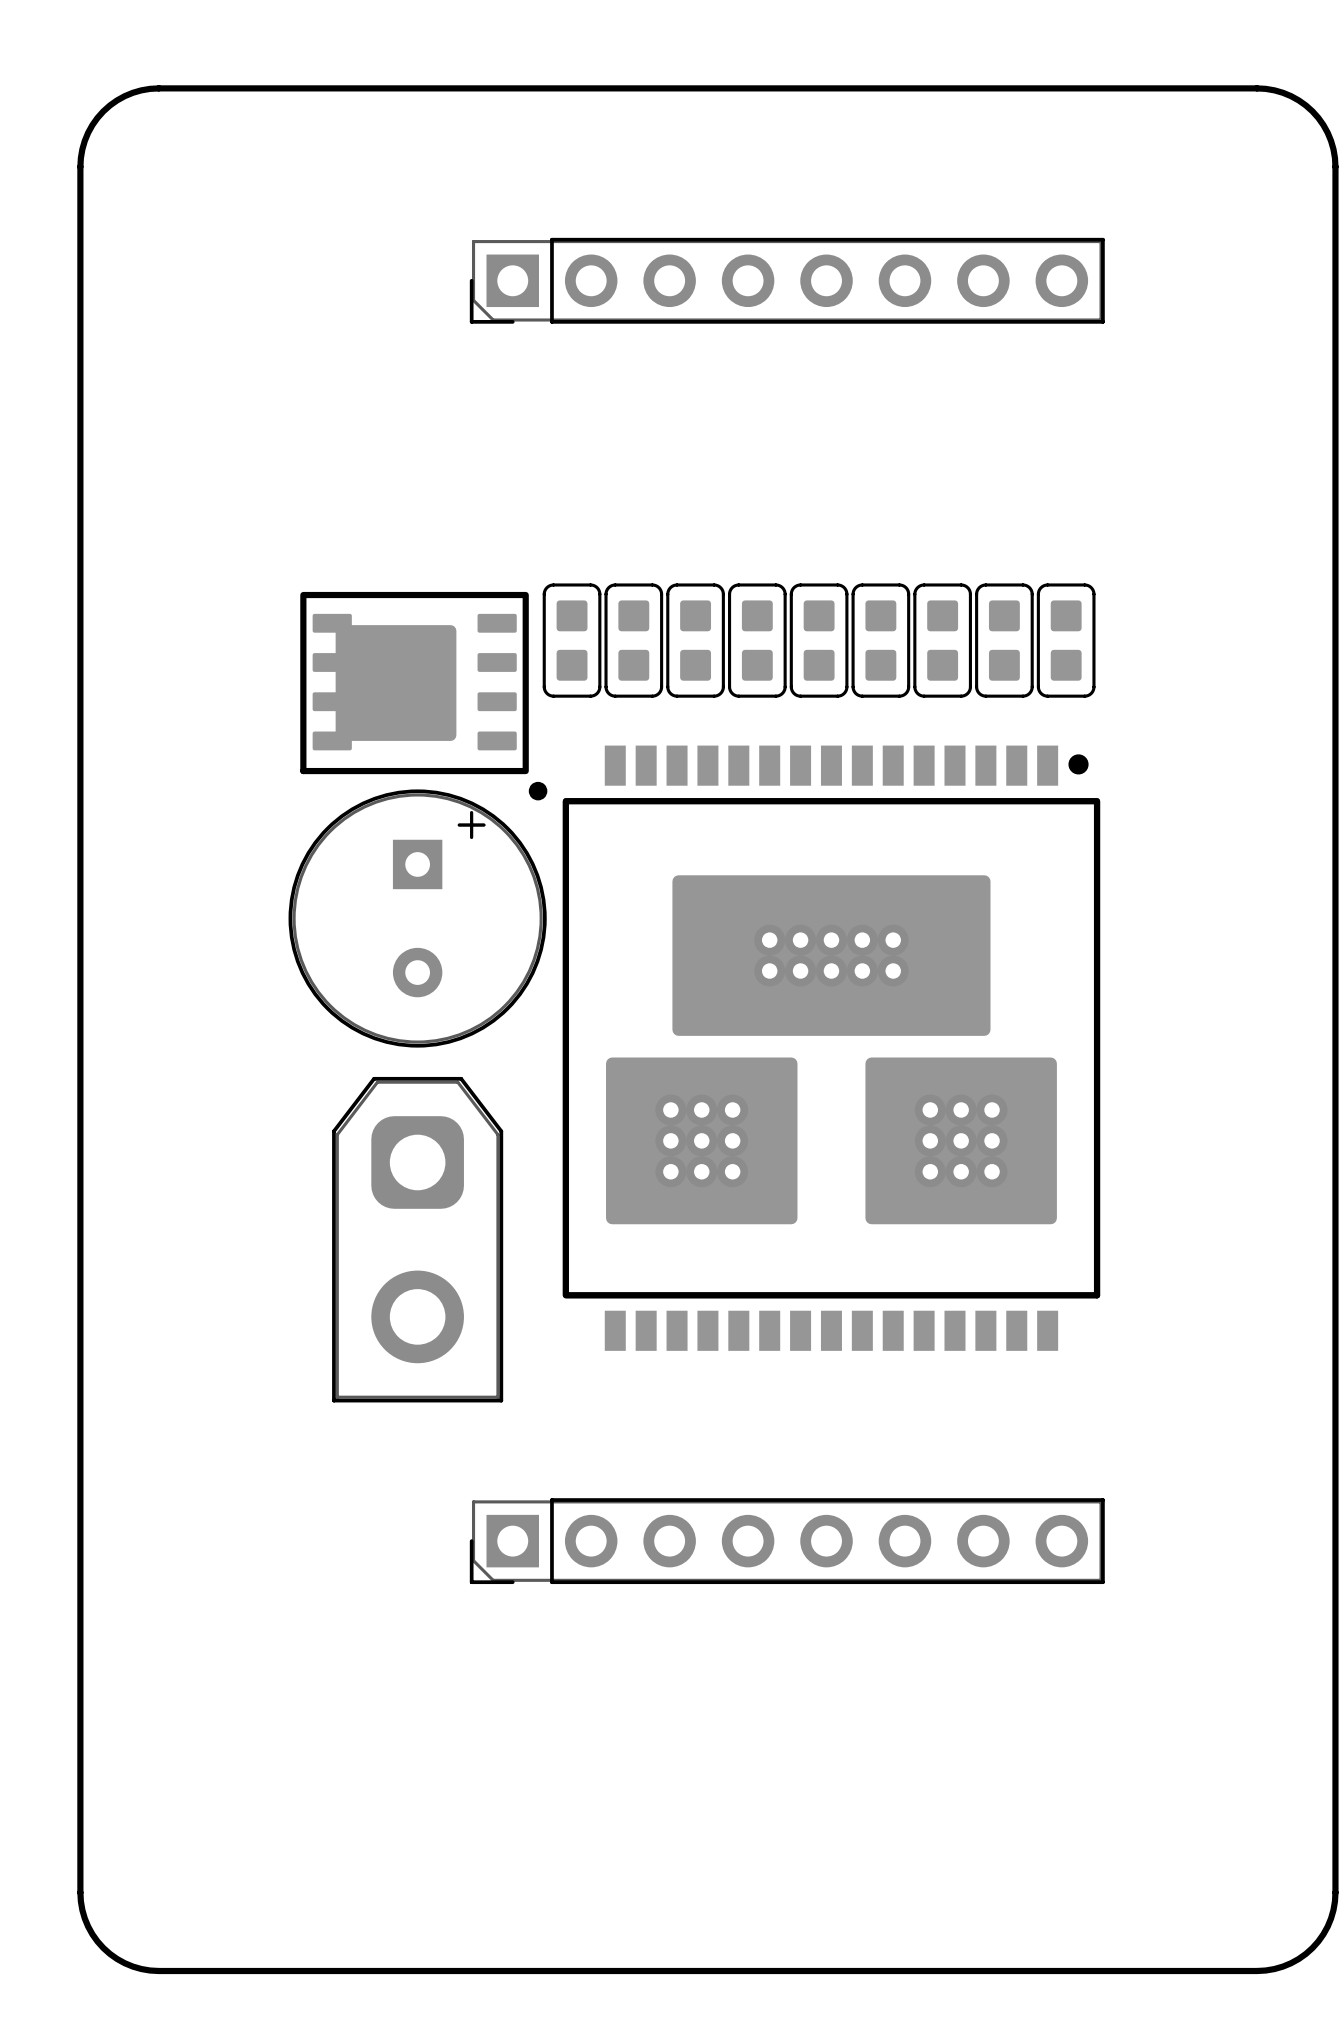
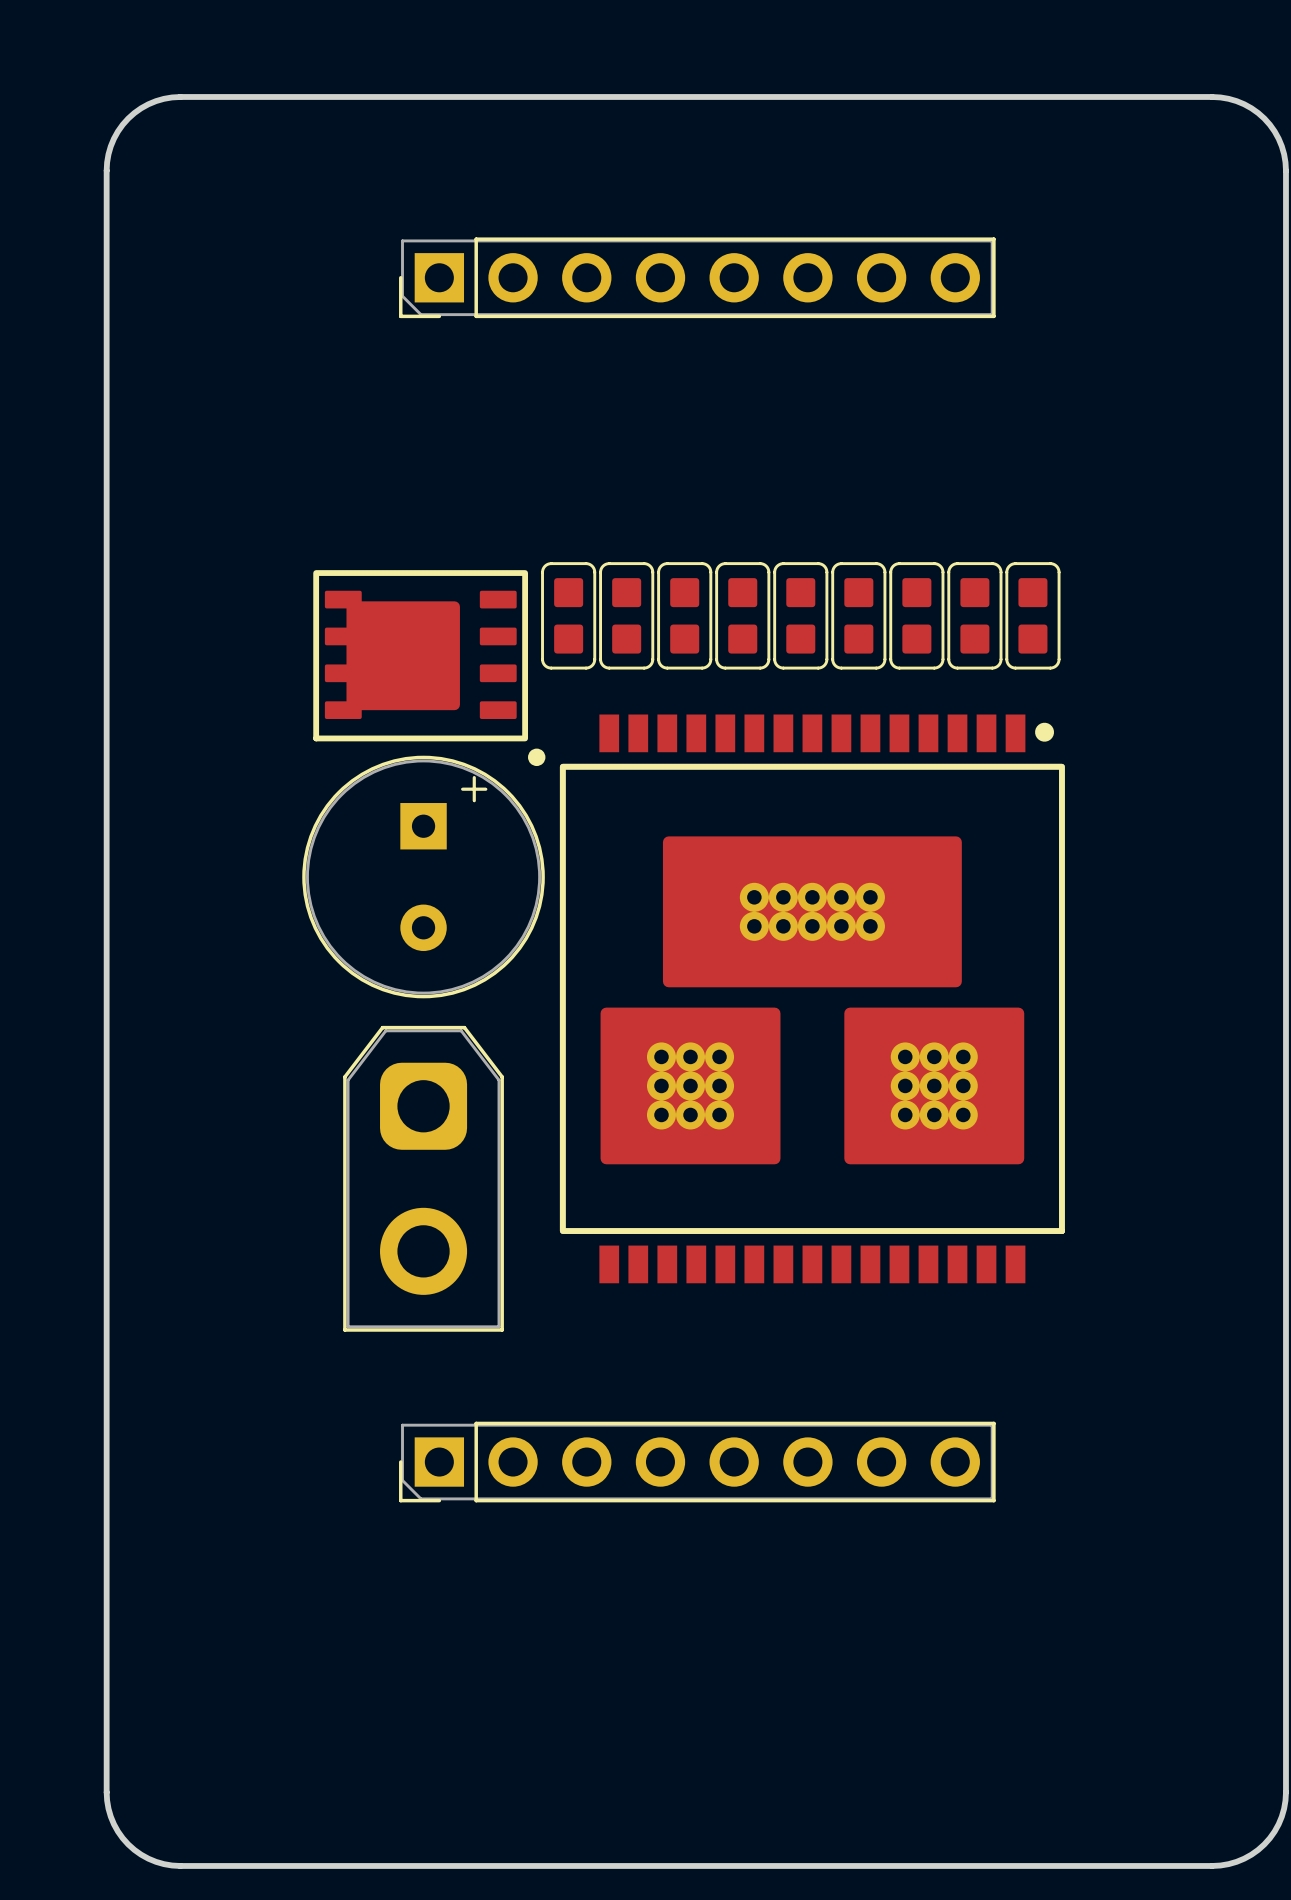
part position: (787, 280) -> (697, 277)
part position: (787, 1541) -> (697, 1462)

